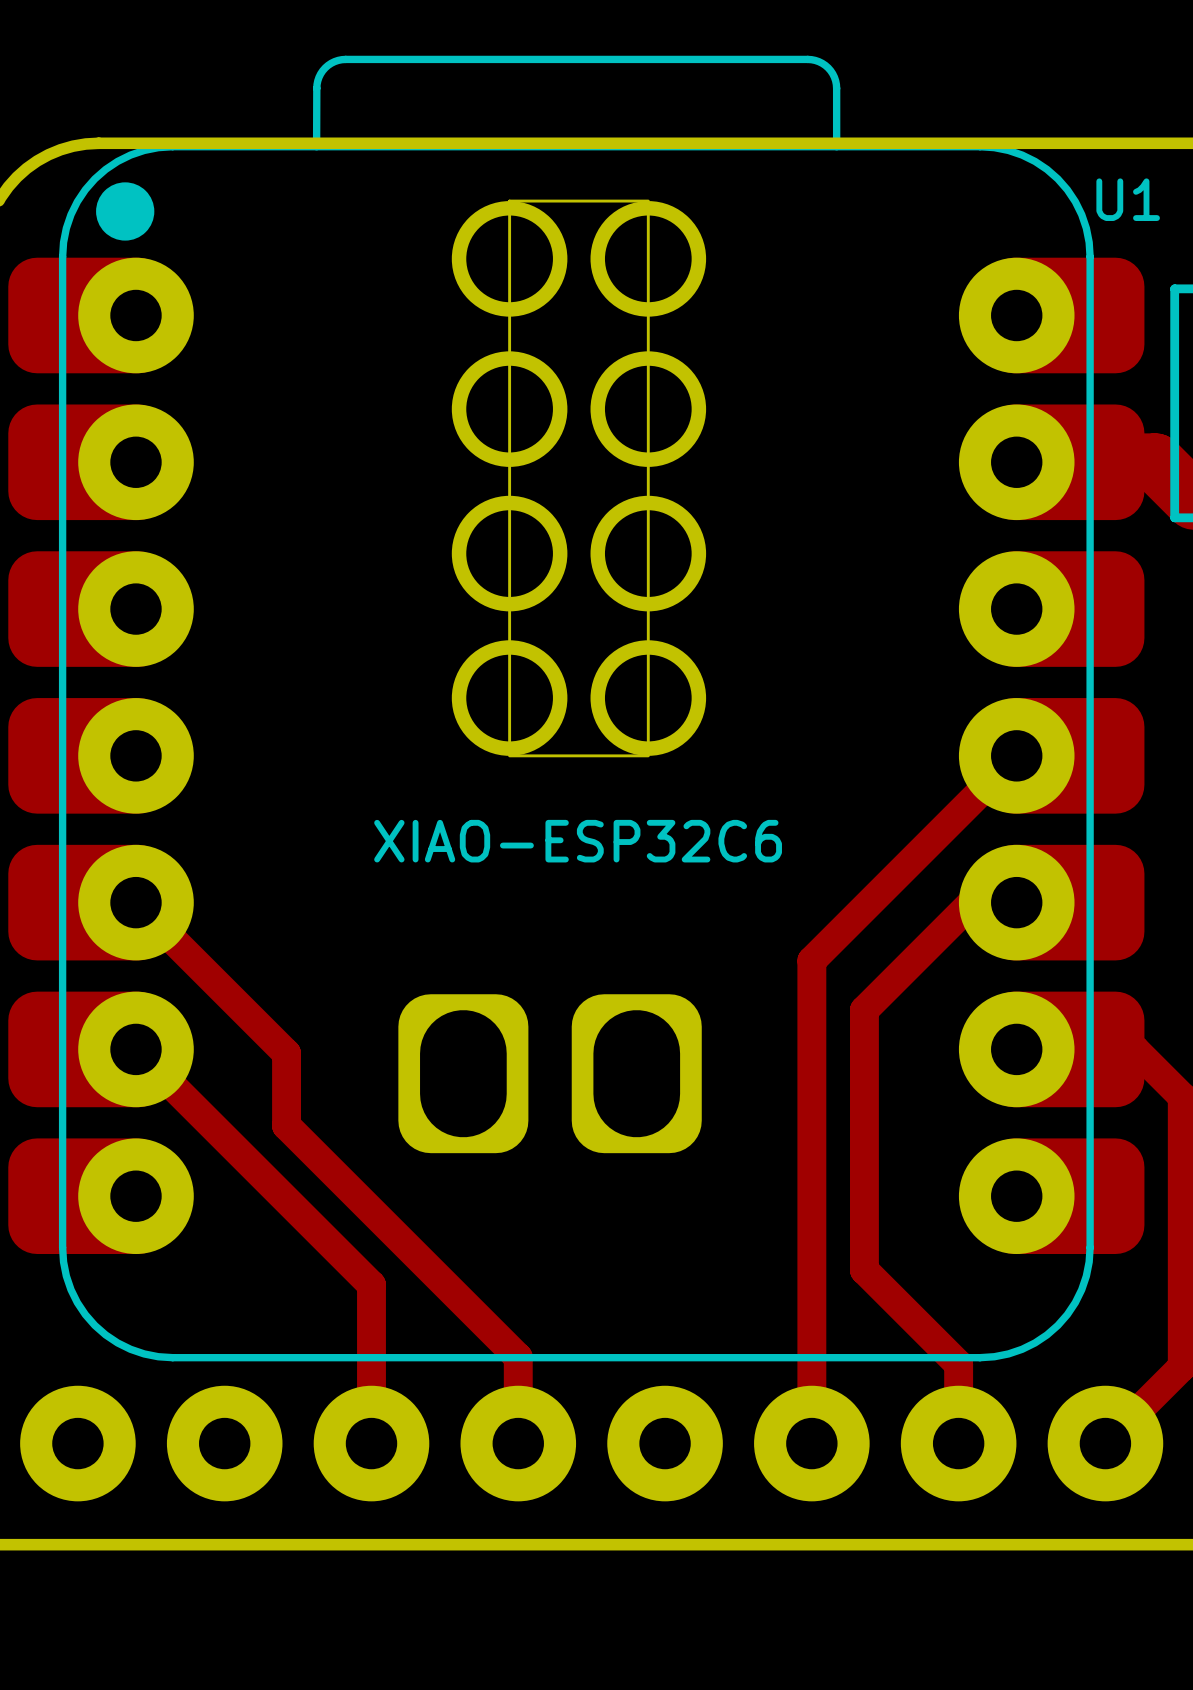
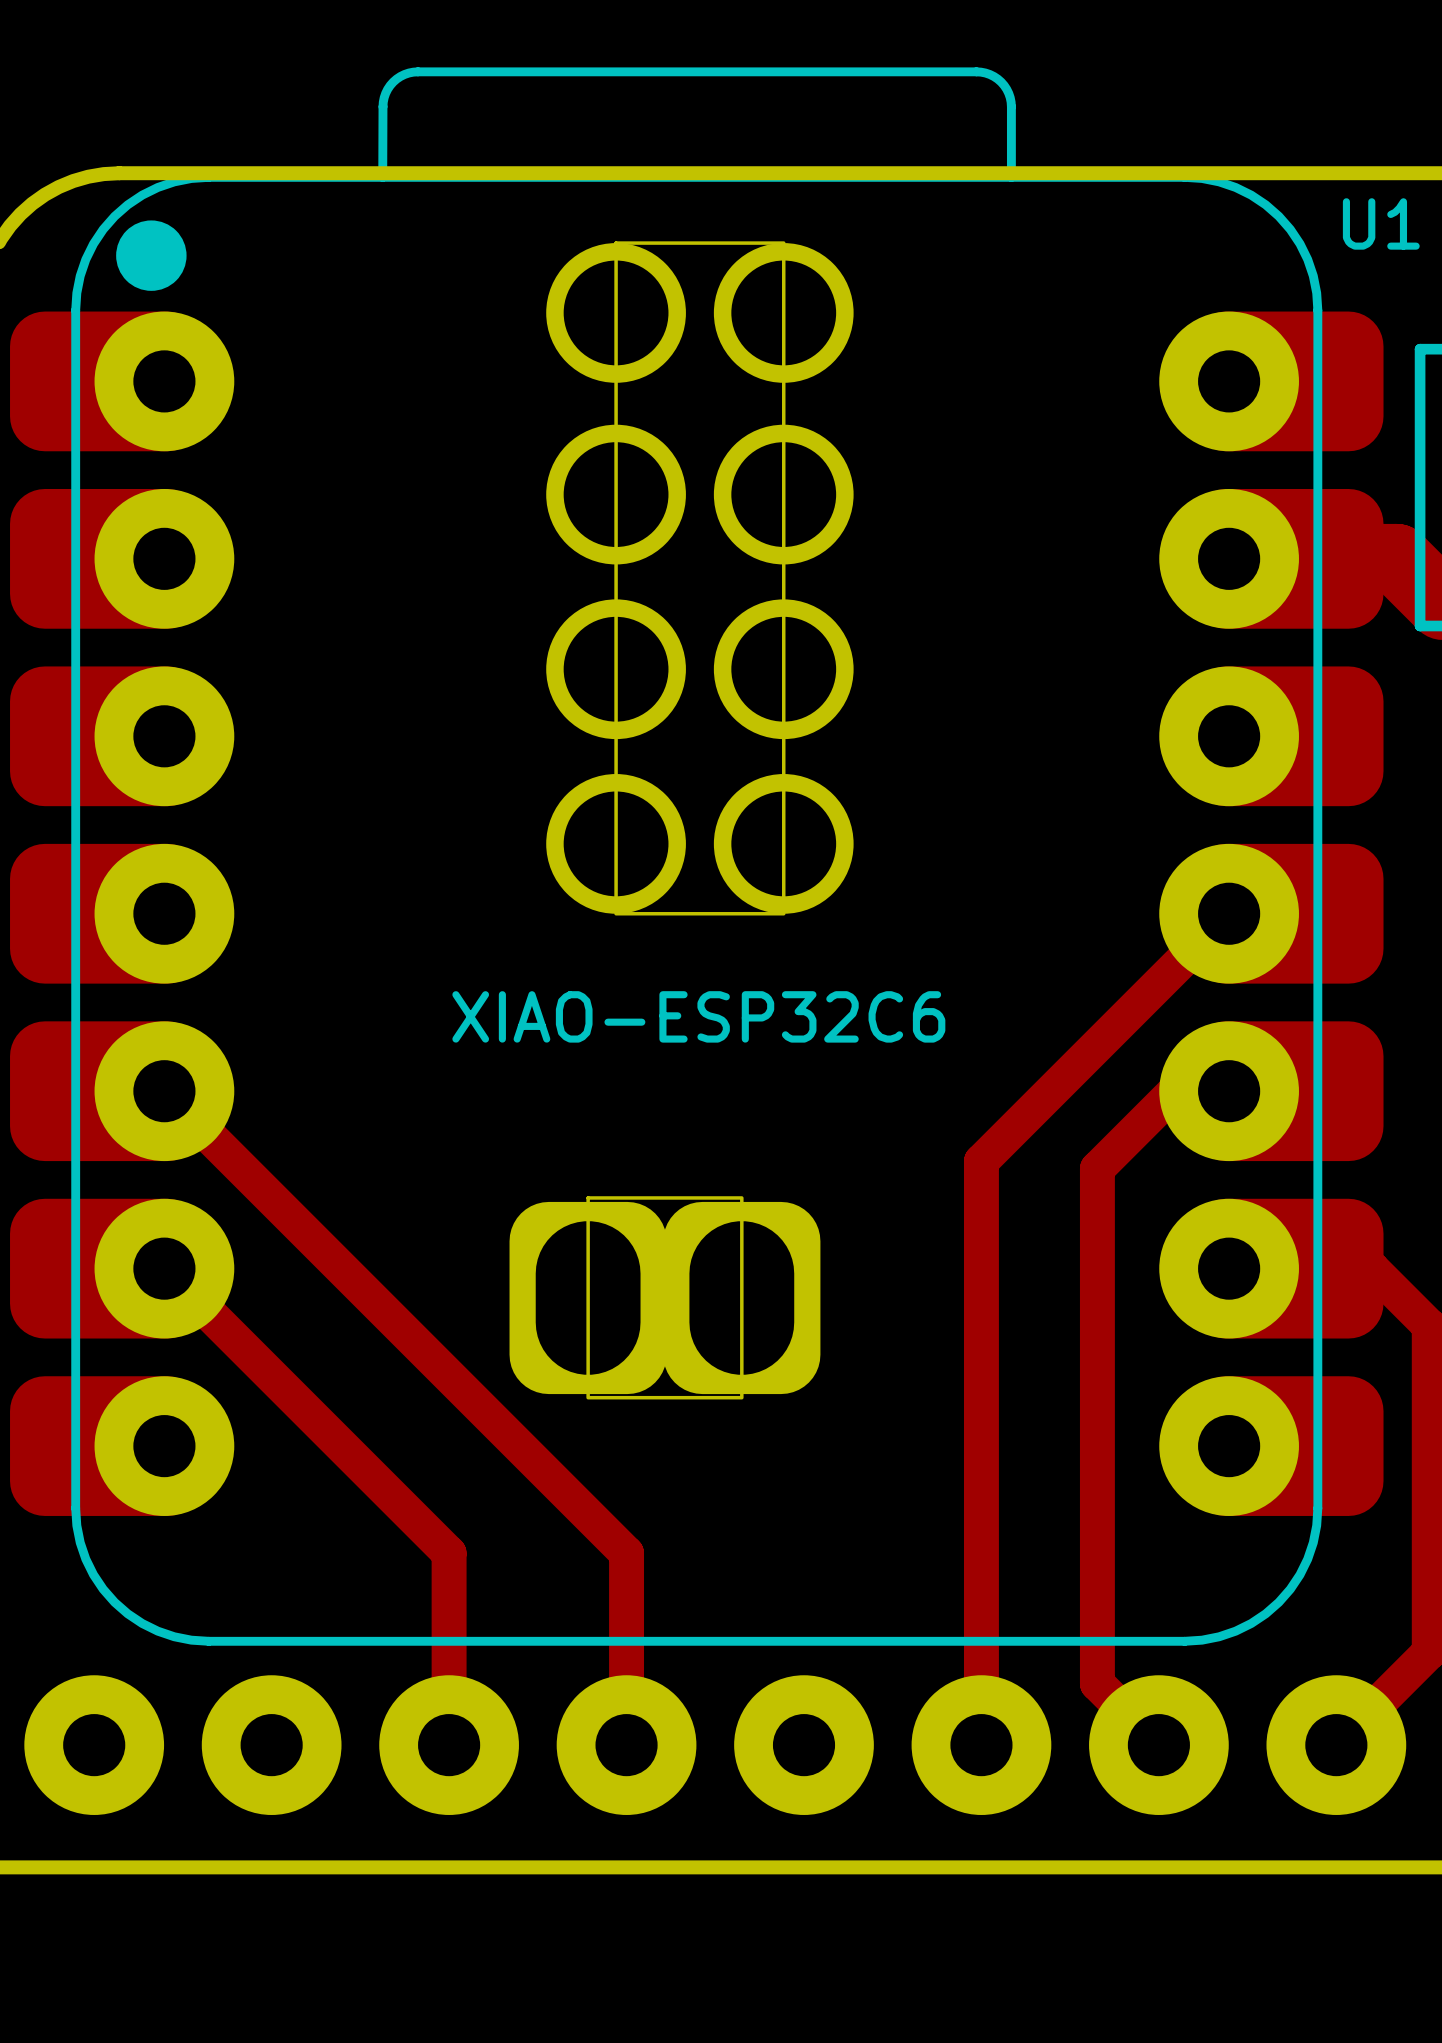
U1 footprint: [8, 55, 1145, 1362] -> [10, 67, 1384, 1646]
track: (136, 902) (286, 1053) (286, 1125) (518, 1357) -> (164, 1091) (626, 1553) (626, 1641)
track: (907, 966) (864, 1010) (864, 1270) (958, 1364) (958, 1443) -> (1097, 1168) (1097, 1683) (1158, 1745)

